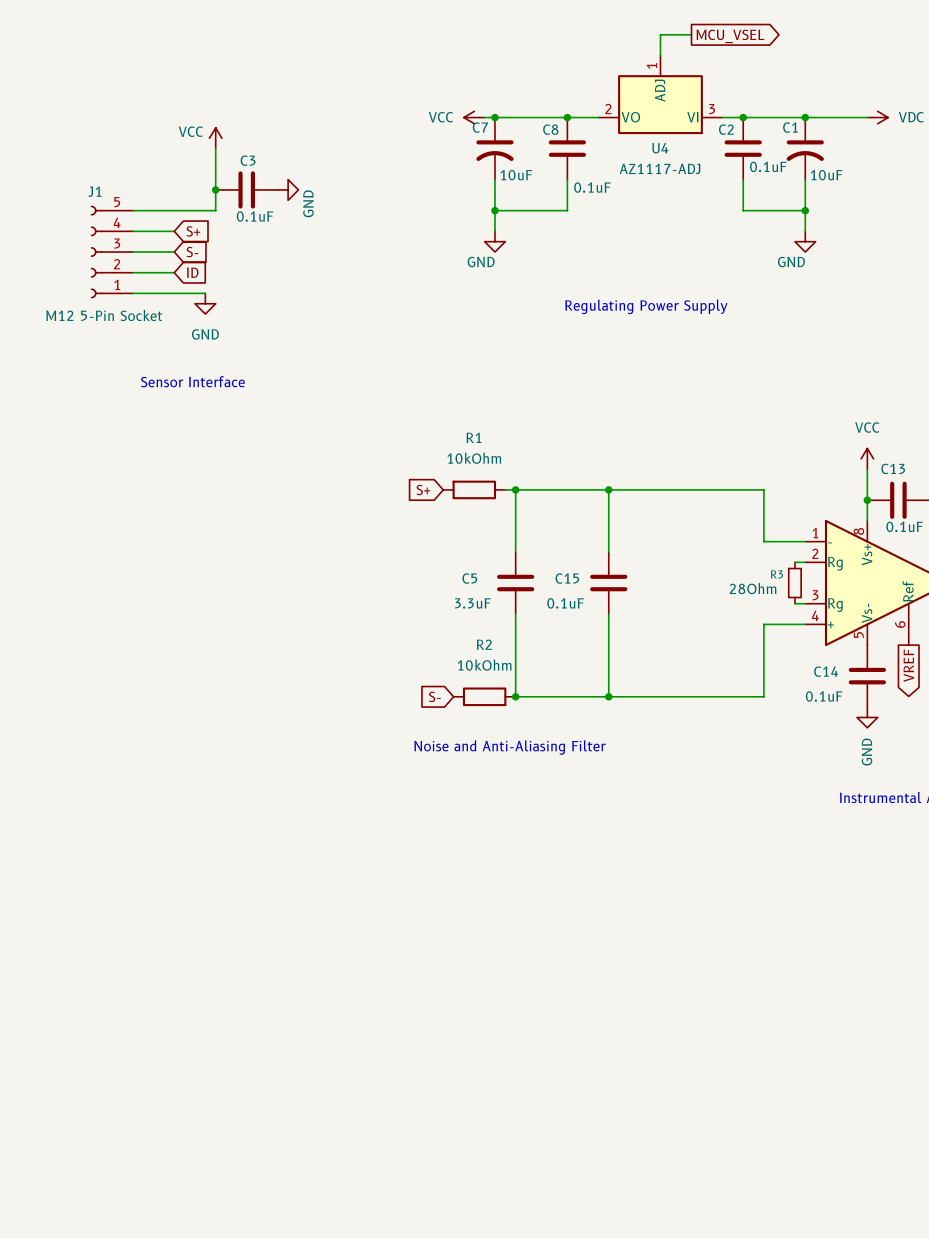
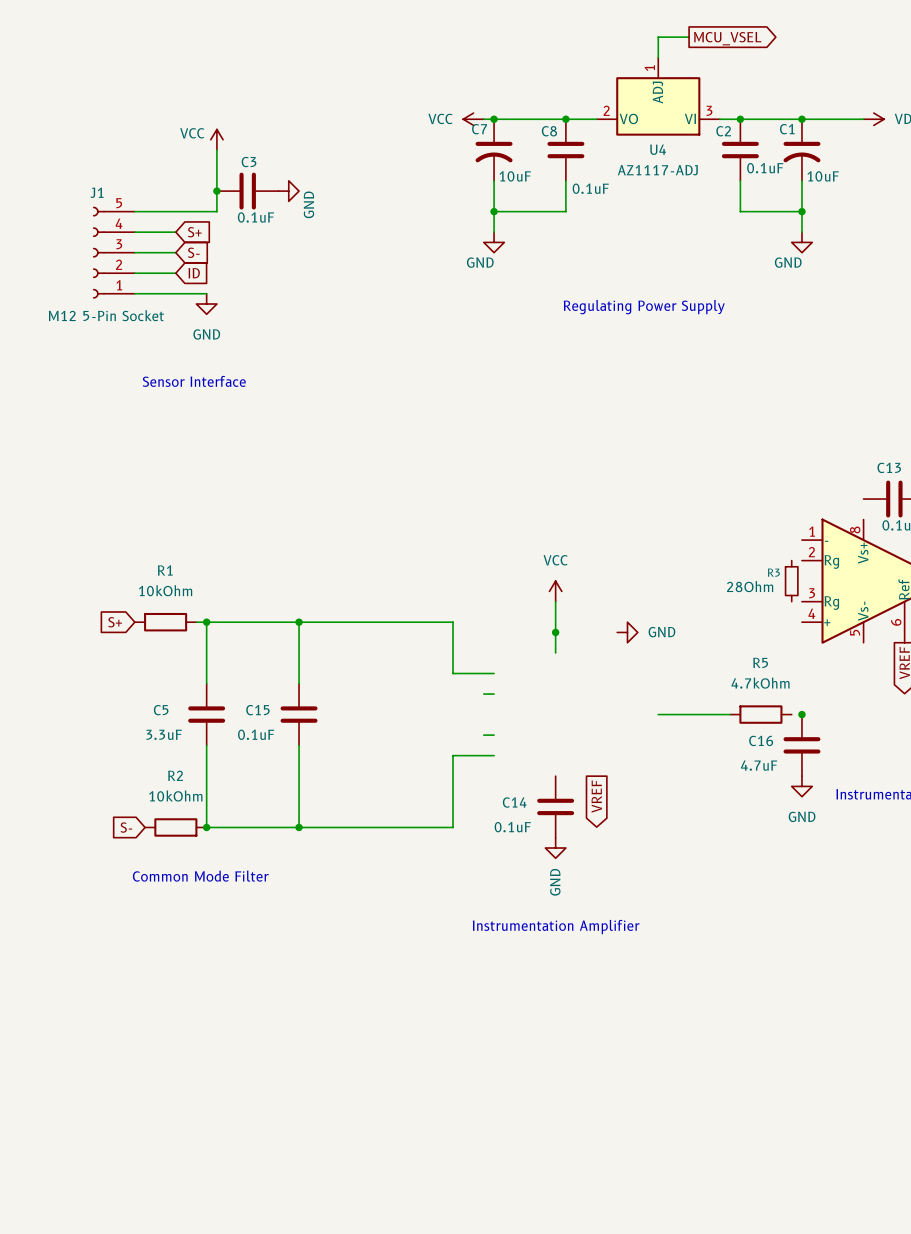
power symbol: VCC (867, 458) -> none
wire: (867, 469) (867, 520) -> none
R1 position: (474, 489) -> (165, 622)
wire: (505, 489) (763, 489) (763, 541) (805, 541) -> none
wire: (515, 489) (515, 551) -> none
junction: (515, 489) -> none
wire: (608, 489) (608, 551) -> none
junction: (608, 489) -> none
global label: S+ (423, 490) -> none
junction: (867, 500) -> none
wire: (794, 562) (805, 562) -> none
C5 position: (515, 583) -> (206, 714)
C15 position: (608, 583) -> (299, 714)
power symbol: none -> VCC (555, 591)
wire: none -> (555, 601) (555, 652)
wire: (794, 603) (805, 603) -> none
wire: (515, 614) (515, 696) (763, 696) (763, 624) (805, 624) -> none
wire: (608, 614) (608, 696) -> none
global label: none -> S+ (115, 622)
wire: none -> (196, 622) (452, 622) (452, 673) (494, 673)
wire: none -> (206, 622) (206, 683)
junction: none -> (206, 622)
wire: none -> (299, 622) (299, 683)
junction: none -> (299, 622)
junction: none -> (555, 632)
power symbol: none -> GND (627, 632)
C14 position: (867, 676) -> (555, 806)
global label: S- (434, 696) -> none
wire: none -> (483, 694) (494, 694)
R2 position: (484, 696) -> (175, 827)
junction: (515, 696) -> none
junction: (608, 696) -> none
wire: none -> (658, 714) (730, 714)
R5: none -> 4.7kOhm (760, 714)
junction: none -> (801, 714)
power symbol: GND (867, 717) -> none
wire: none -> (483, 735) (494, 735)
text: Noise and Anti-Aliasing Filter (510, 747) -> none
wire: none -> (206, 745) (206, 827) (452, 827) (452, 755) (494, 755)
wire: none -> (299, 745) (299, 827)
C16: none -> 4.7uF (801, 745)
power symbol: none -> GND (801, 786)
global label: none -> VREF (596, 796)
global label: none -> S- (126, 827)
junction: none -> (206, 827)
junction: none -> (299, 827)
power symbol: none -> GND (555, 848)
text: none -> Common Mode Filter (200, 876)
text: none -> Instrumentation Amplifier (556, 927)

